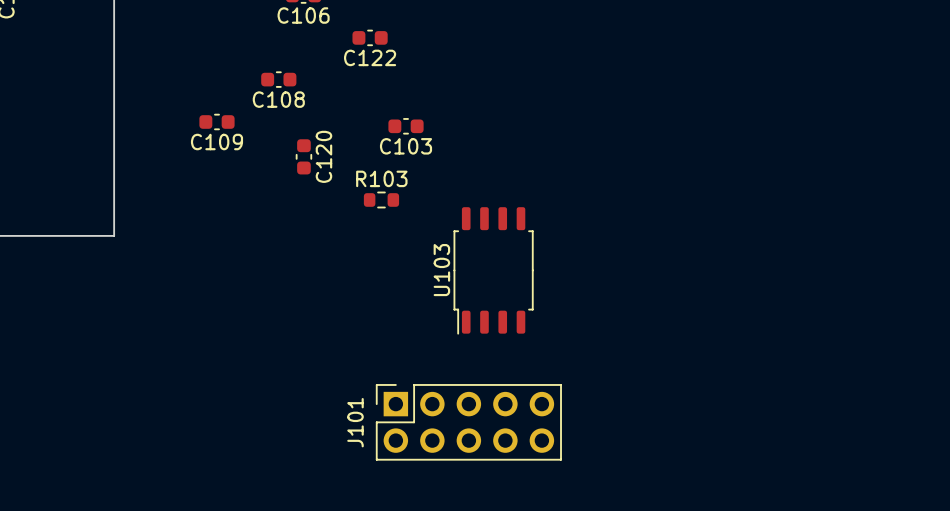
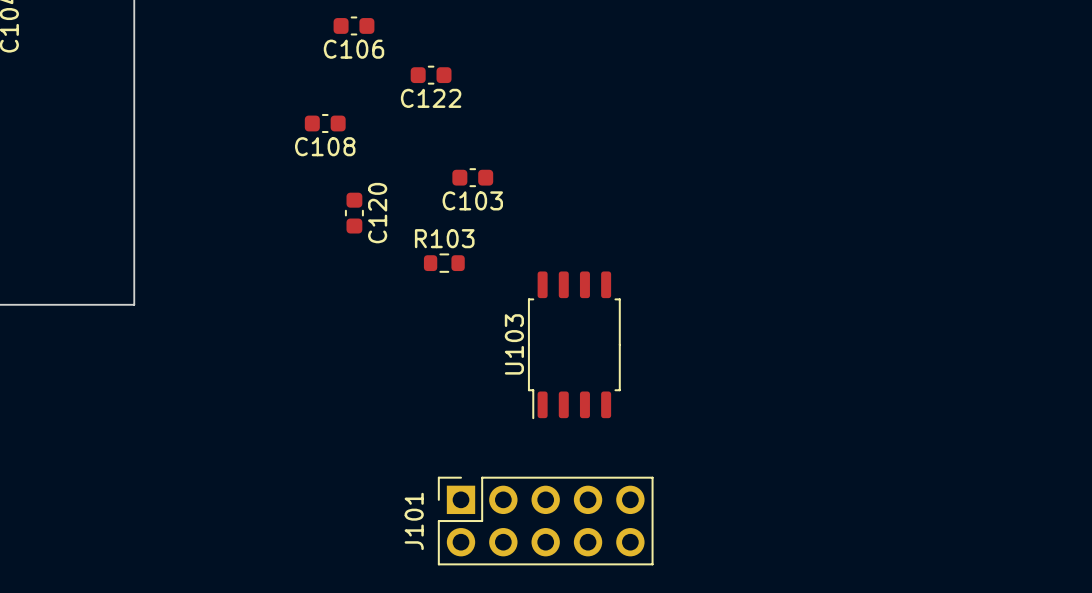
C109: (216, 121) -> none

